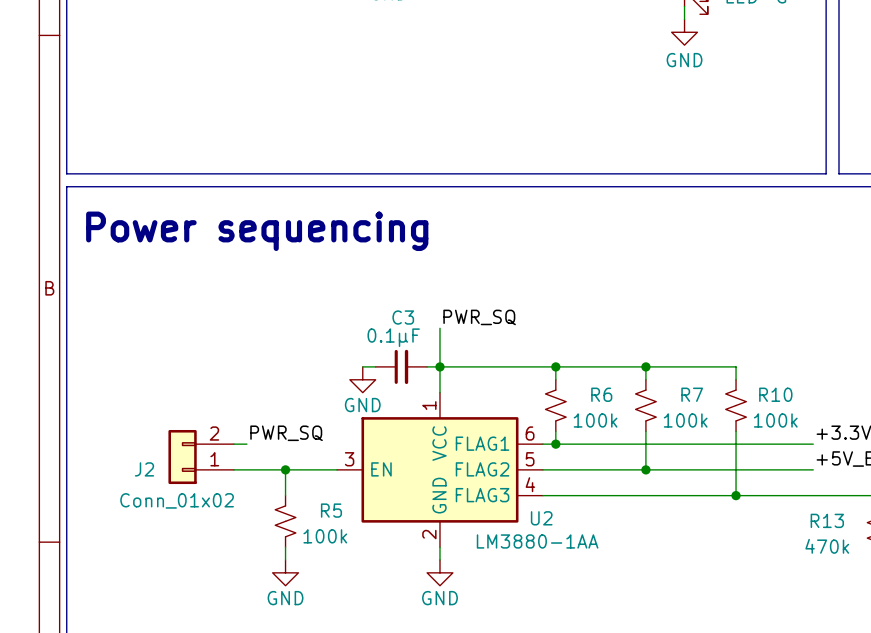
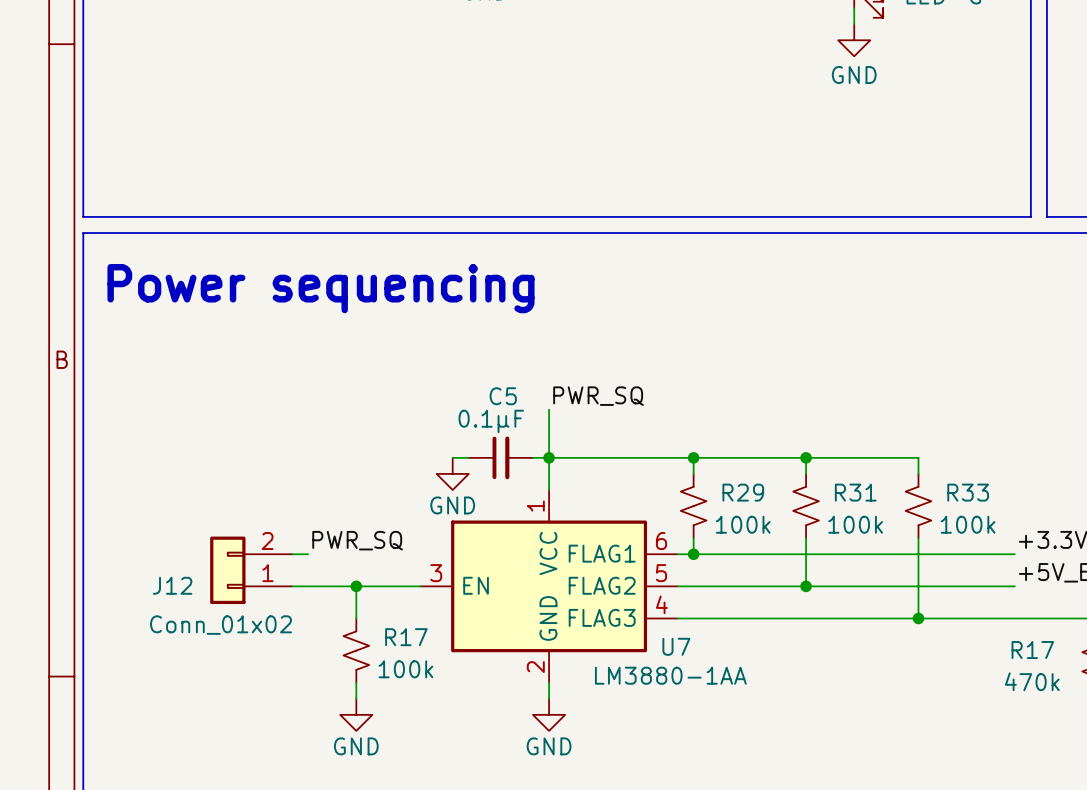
C3 name: C3 (403, 317) -> C5 (503, 396)
R6 name: R6 (601, 394) -> R29 (743, 492)
R7 name: R7 (692, 394) -> R31 (855, 492)
R10 name: R10 (775, 394) -> R33 (968, 492)
J2 name: J2 (144, 469) -> J12 (172, 585)
R5 name: R5 (331, 510) -> R17 (406, 637)
U2 name: U2 (541, 518) -> U7 (676, 646)
R13 name: R13 (827, 520) -> R17 (1032, 650)

